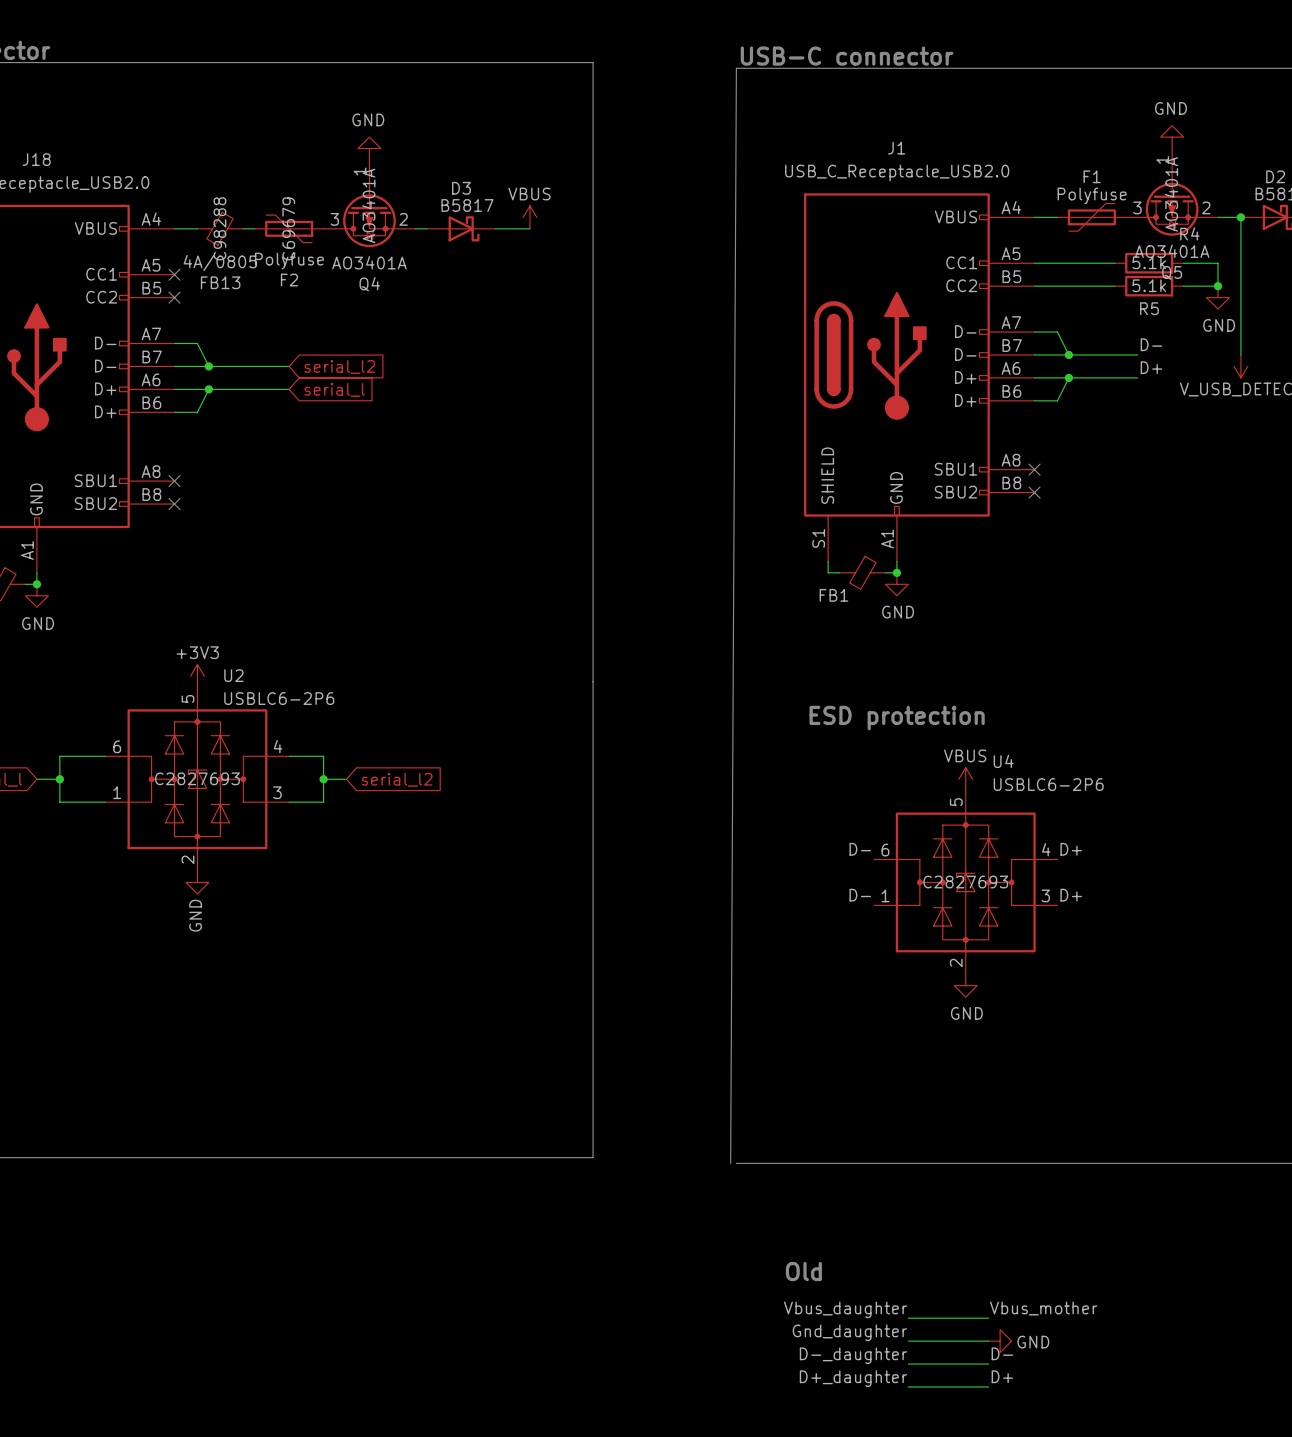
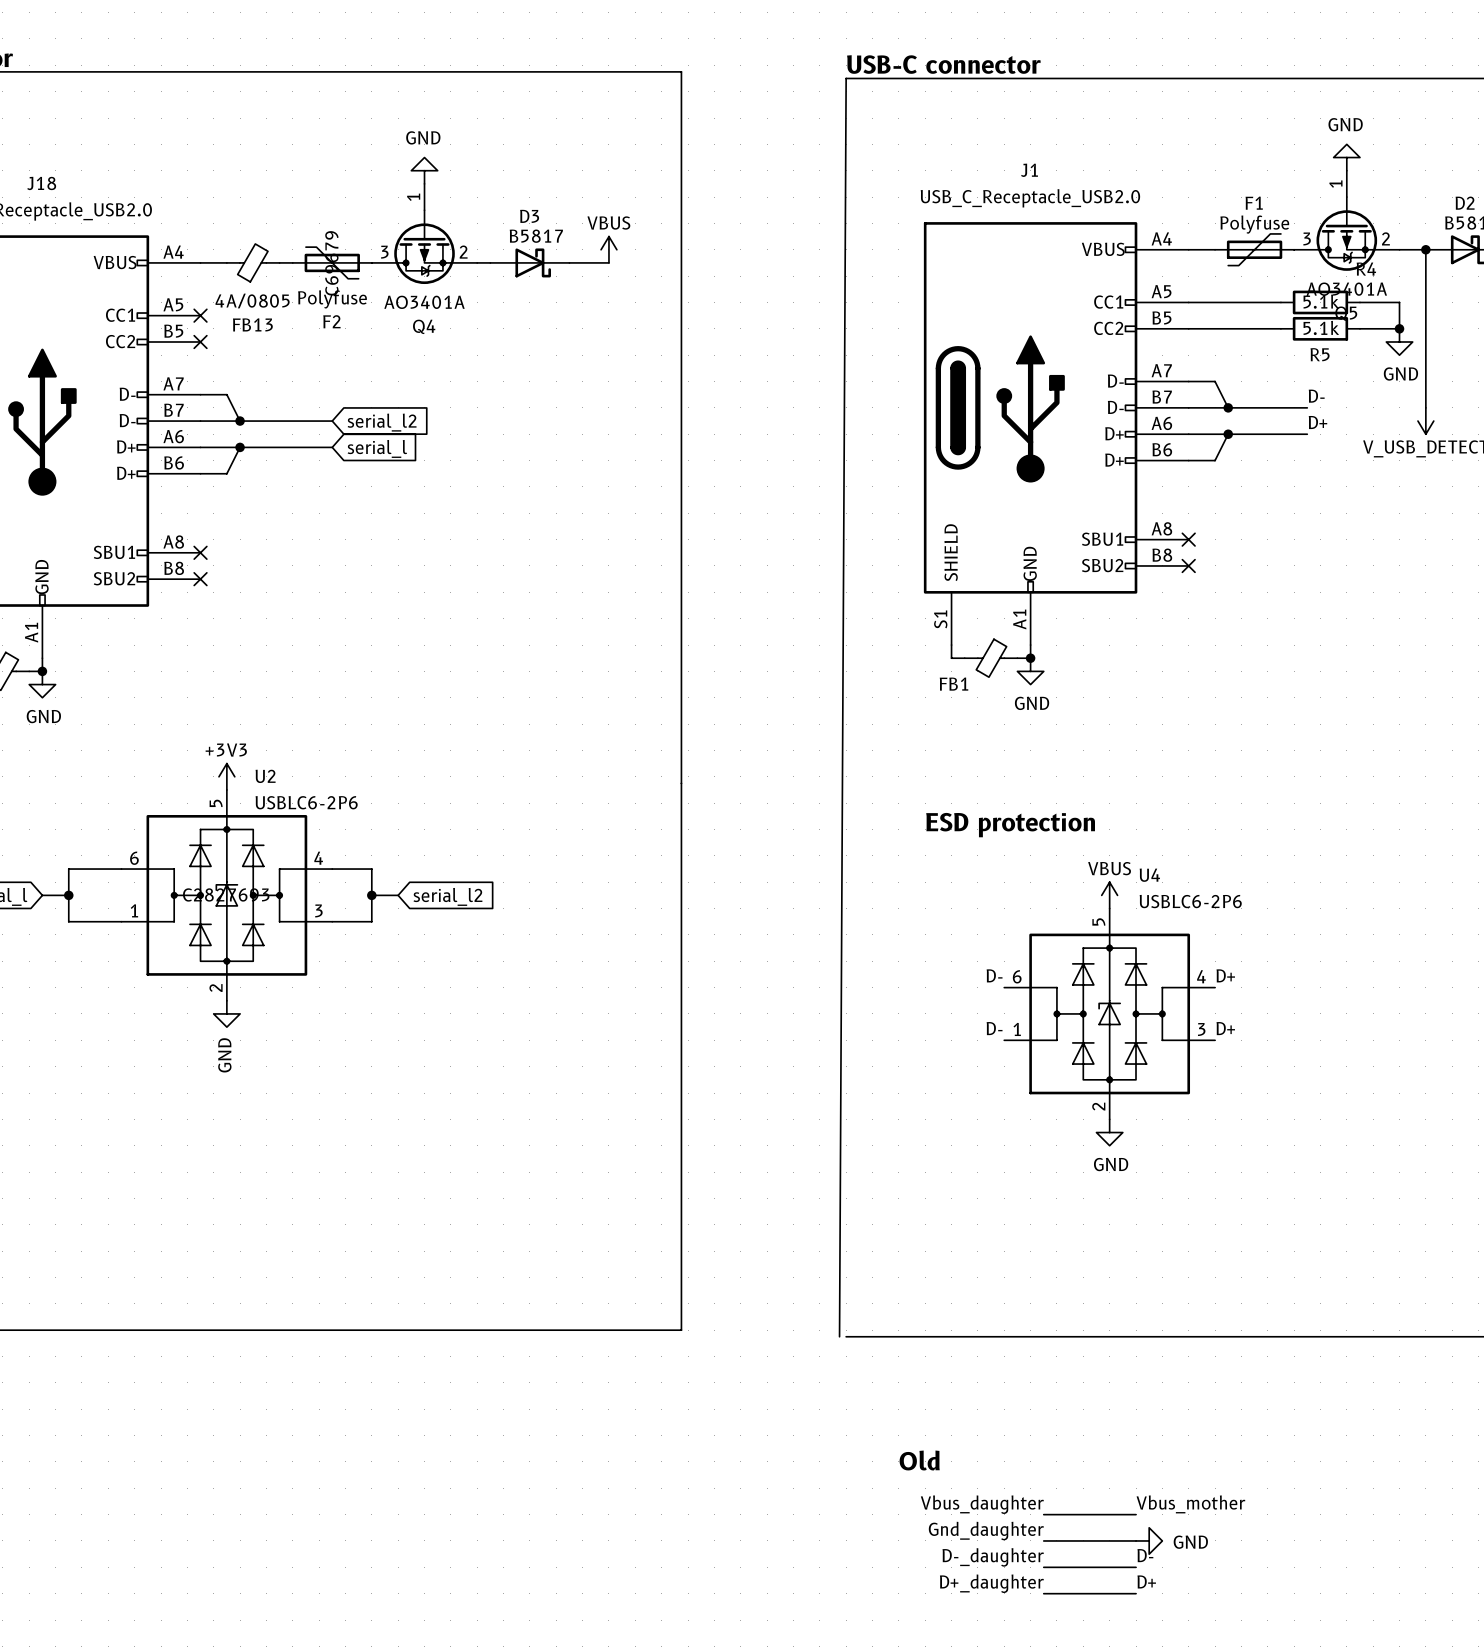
Q5 text: AO3401A (1171, 194) -> none
Q4 text: AO3401A (368, 205) -> none
FB13 text: C98288 (219, 228) -> none
U4 text: C2827693 (965, 882) -> none

